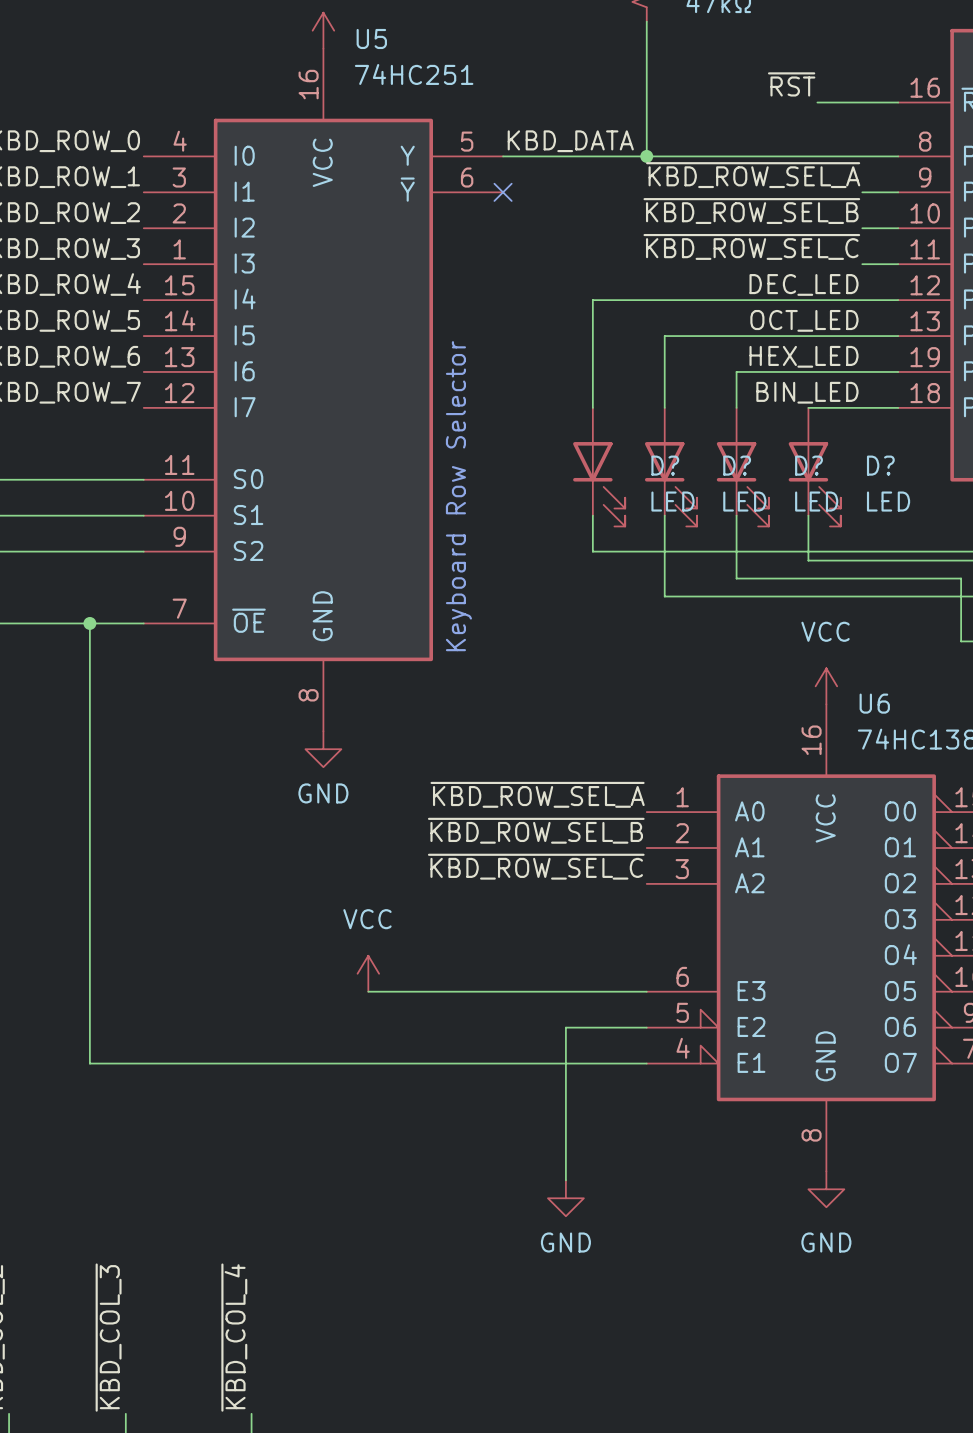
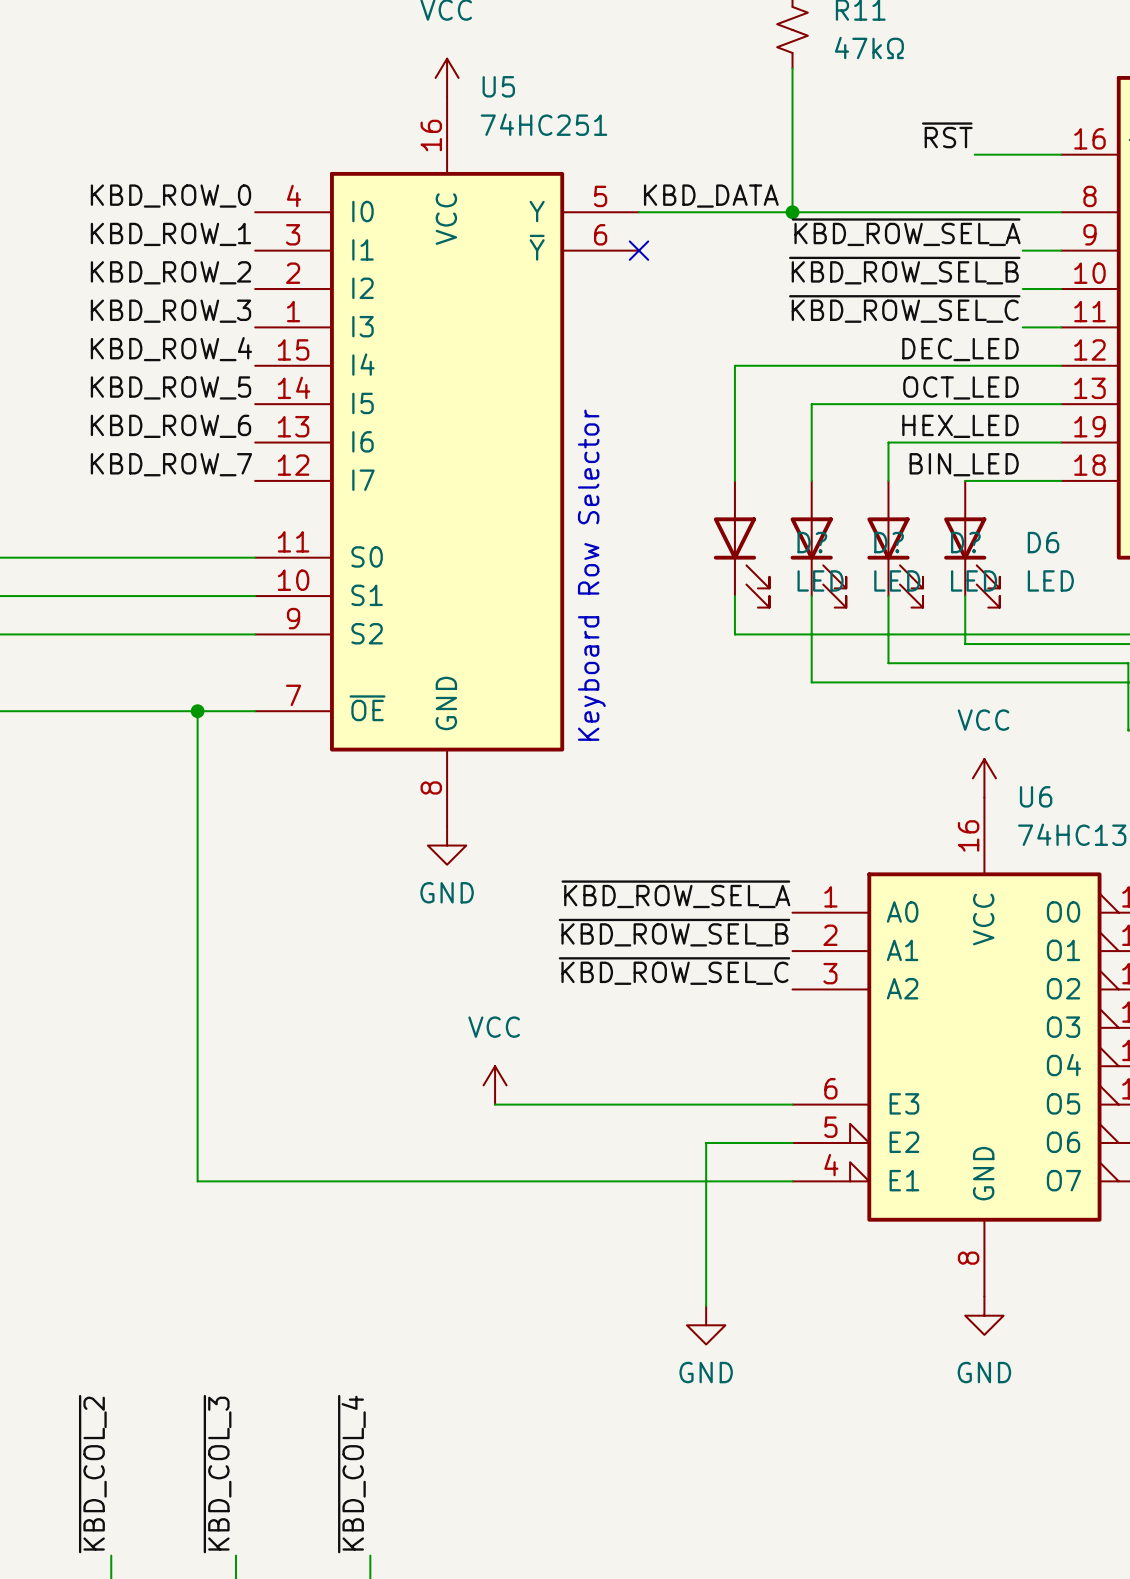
D? name: D? (880, 465) -> D6 (1043, 542)

